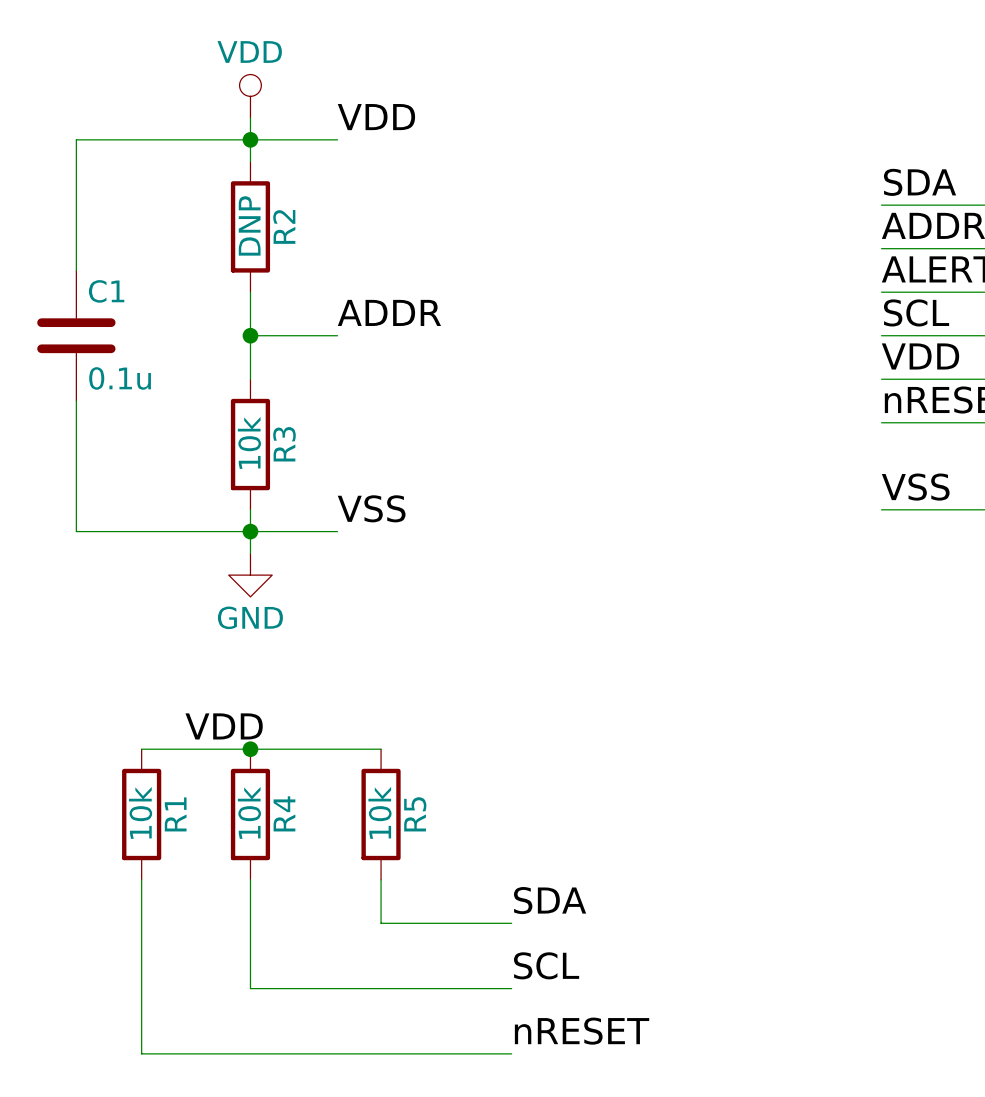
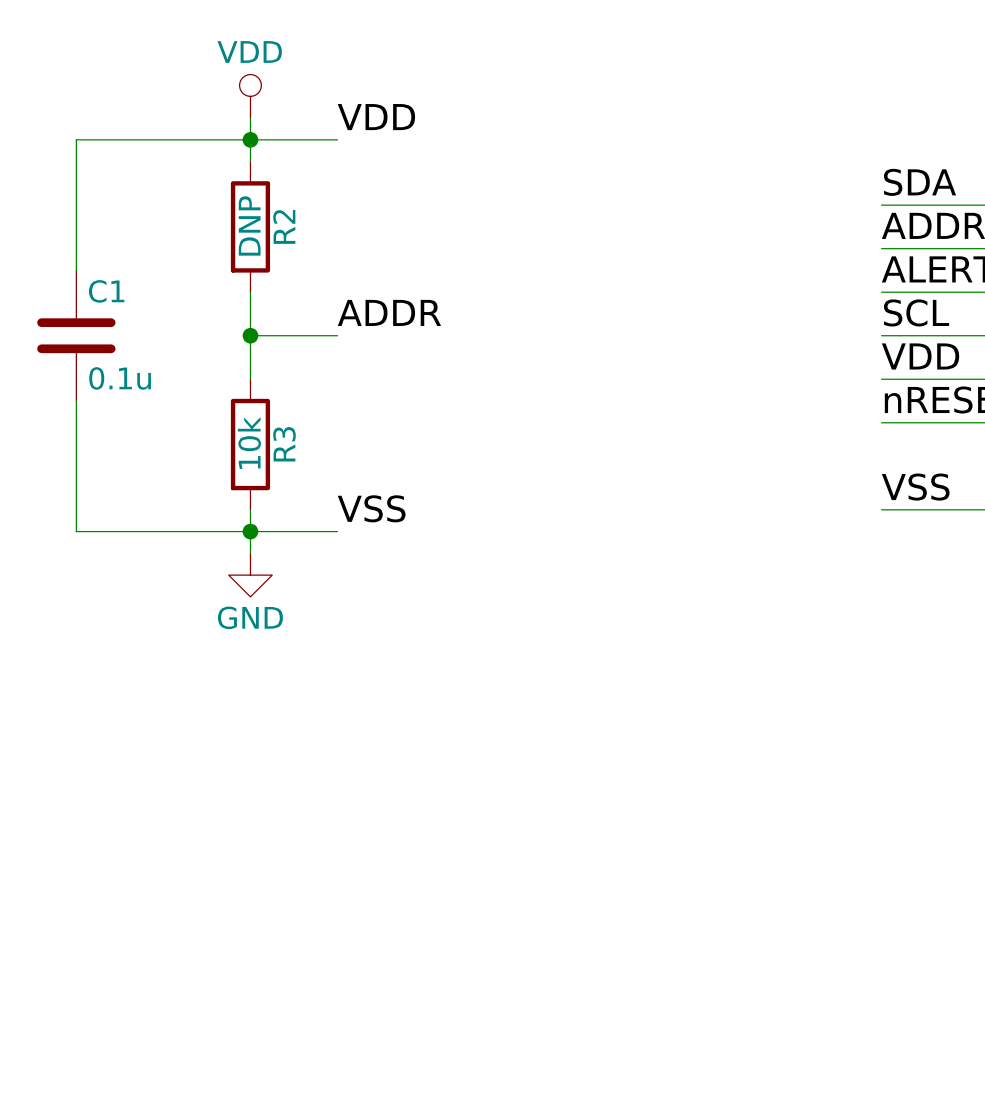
label: VDD (224, 726) -> none
wire: (141, 749) (381, 749) -> none
junction: (250, 749) -> none
R1: 10k (141, 814) -> none
R4: 10k (250, 814) -> none
R5: 10k (381, 814) -> none
wire: (141, 879) (141, 1053) (511, 1053) -> none
wire: (250, 879) (250, 988) (511, 988) -> none
wire: (381, 879) (381, 923) (511, 923) -> none
label: SDA (550, 900) -> none
label: SCL (546, 965) -> none
label: nRESET (582, 1031) -> none

